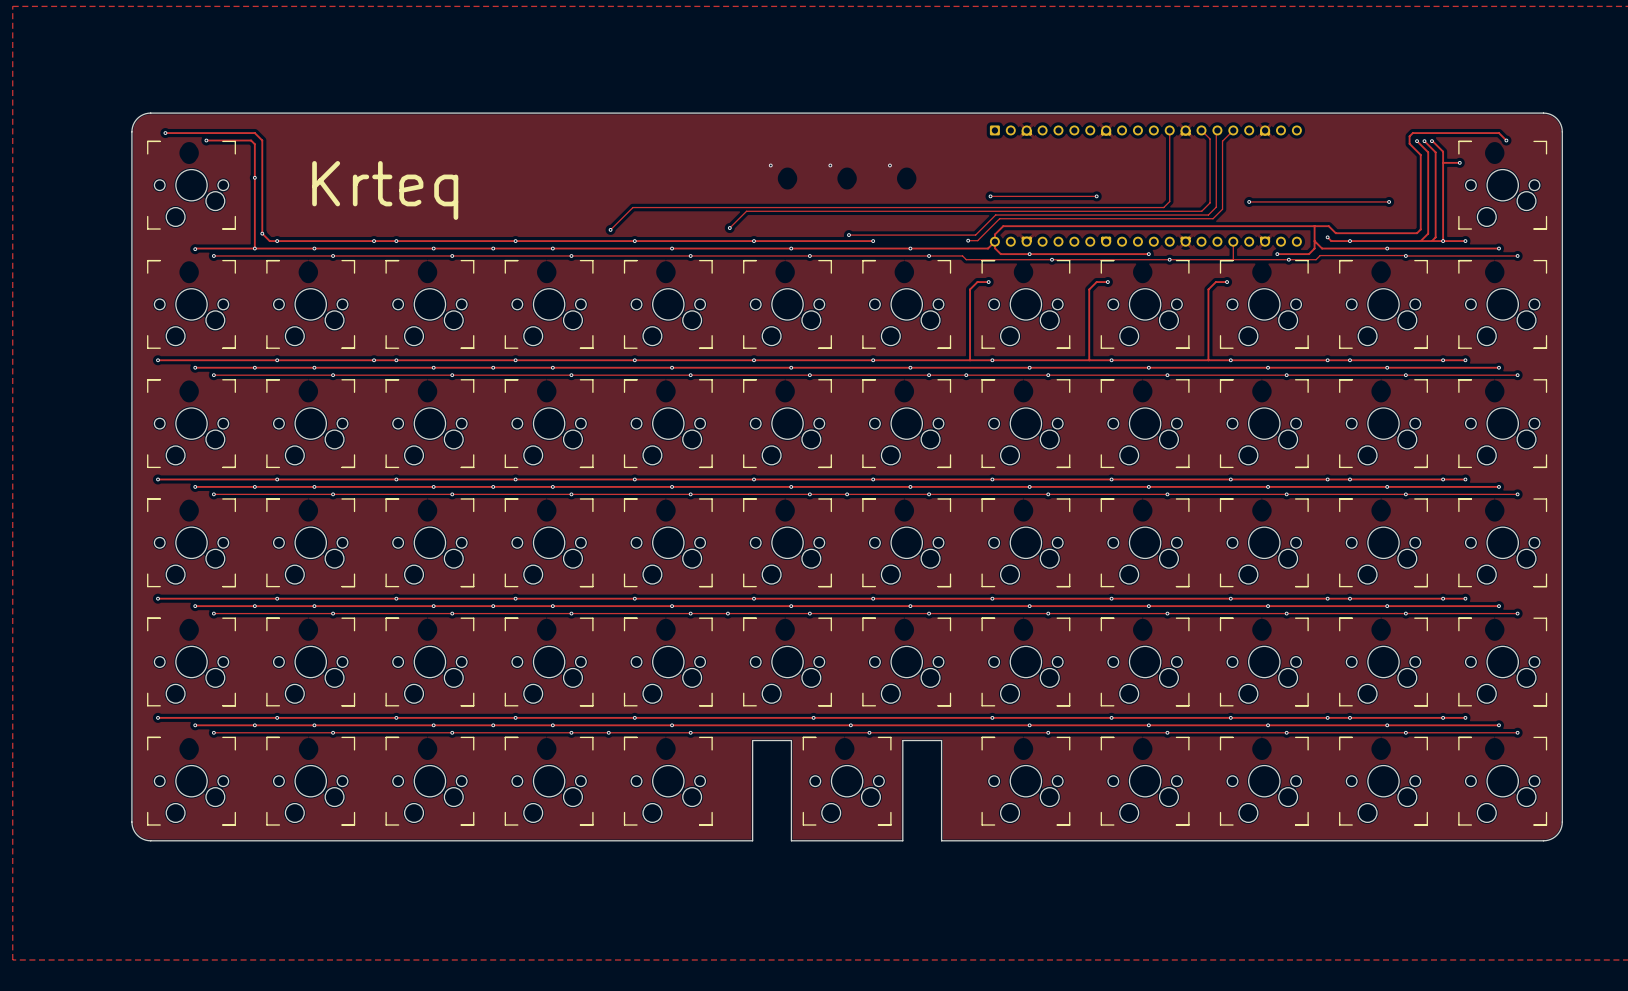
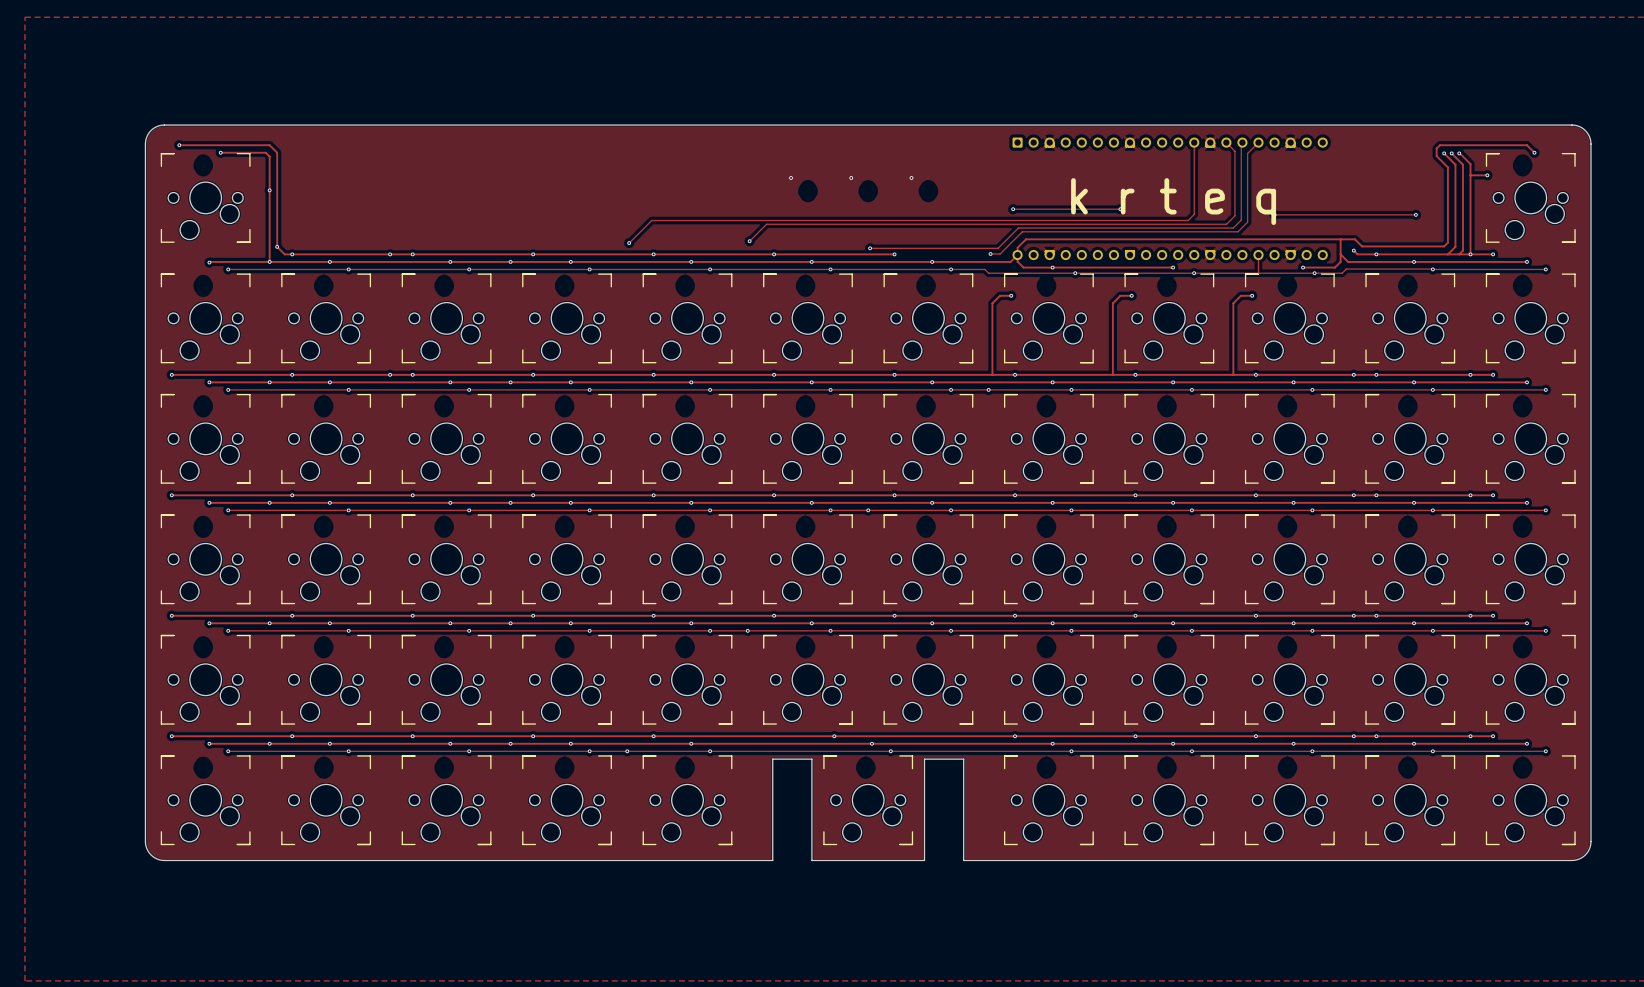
text: none -> k r t e q (1173, 201)
text: Krteq (385, 190) -> none

